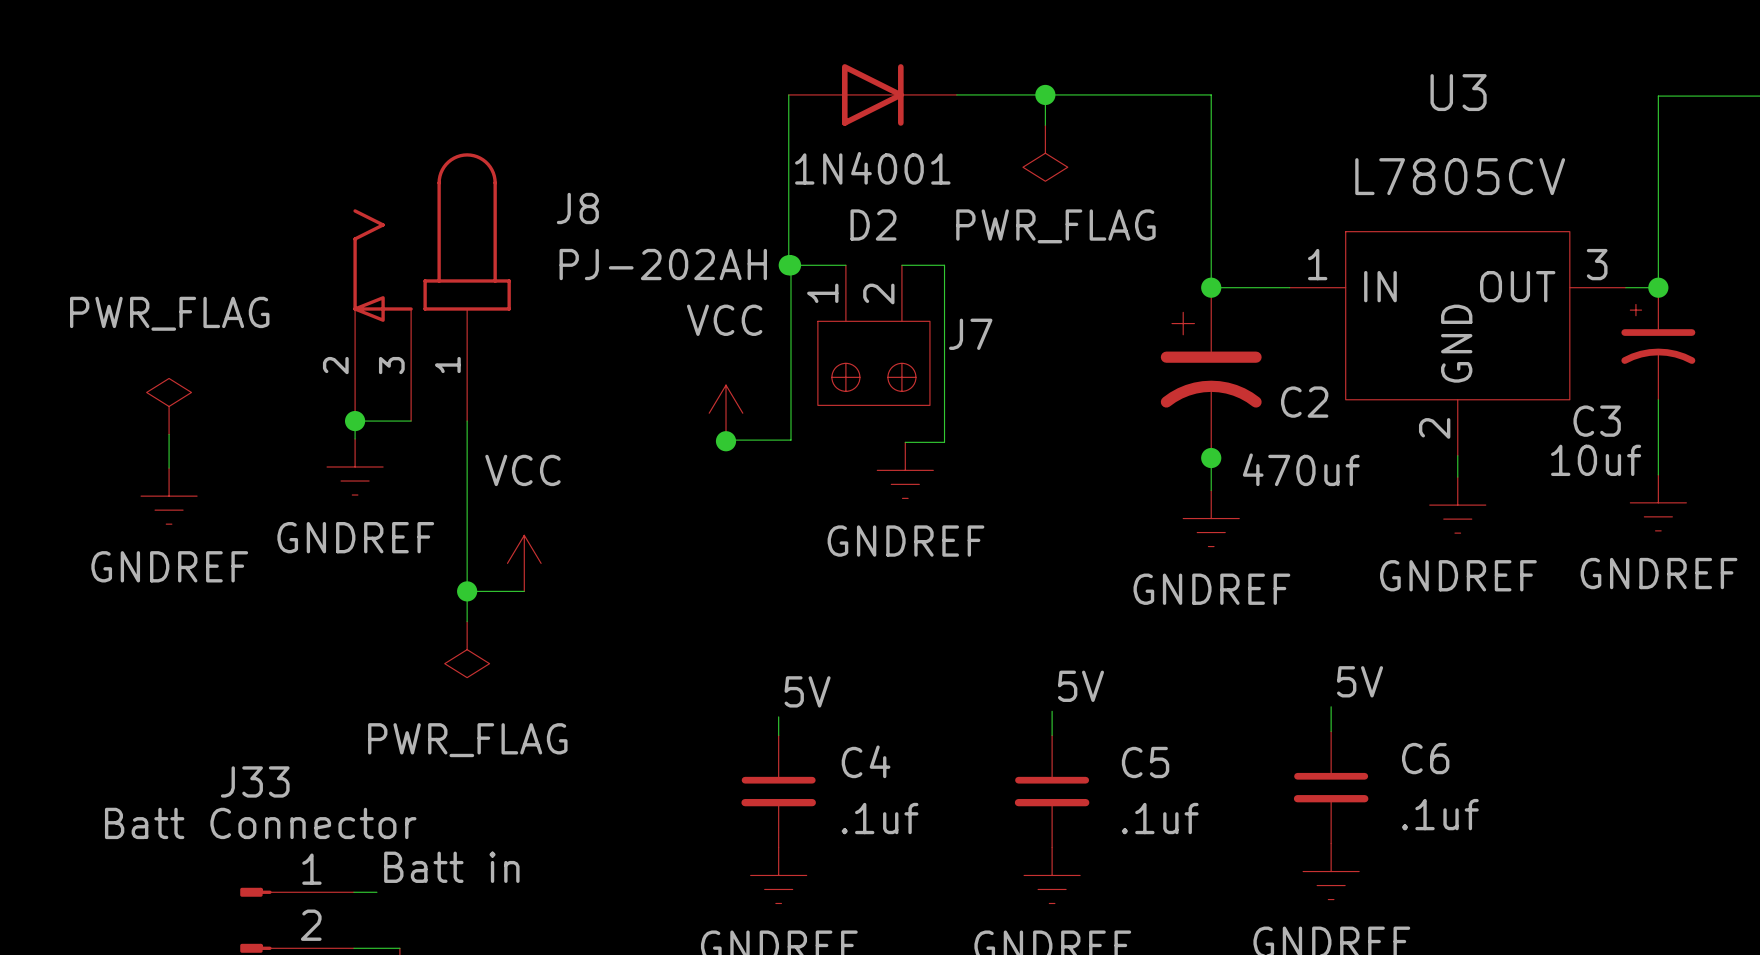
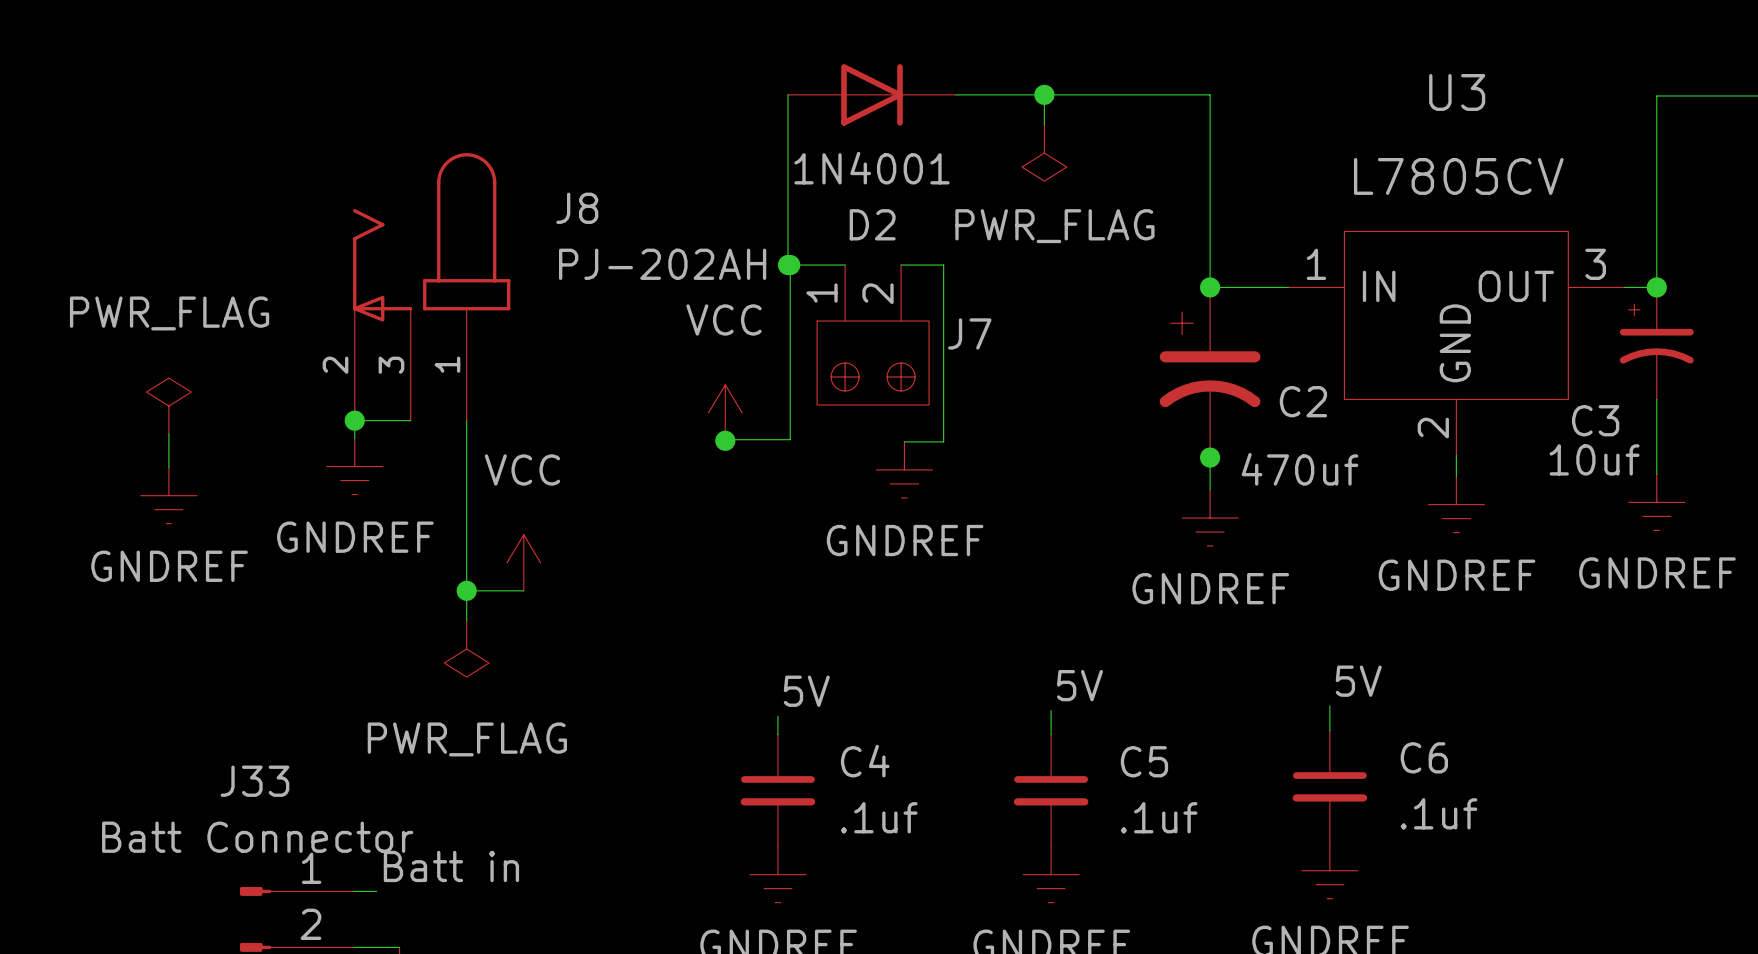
J33 value position: Batt Connector (260, 823) -> Batt Connector (257, 837)

